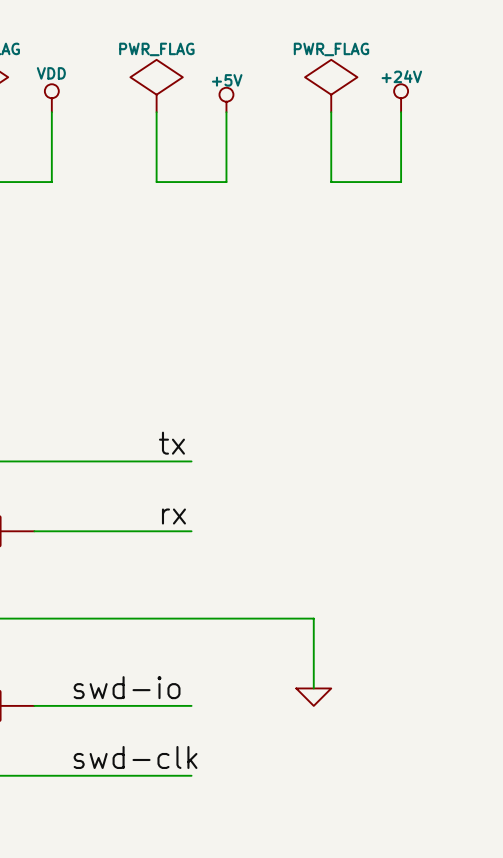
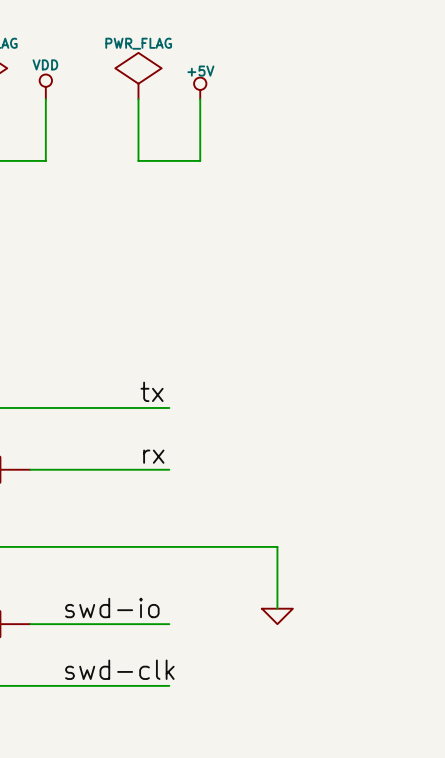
power symbol: PWR_FLAG (331, 86) -> none
power symbol: +24V (401, 98) -> none
wire: (331, 112) (331, 182) (401, 182) (401, 112) -> none

